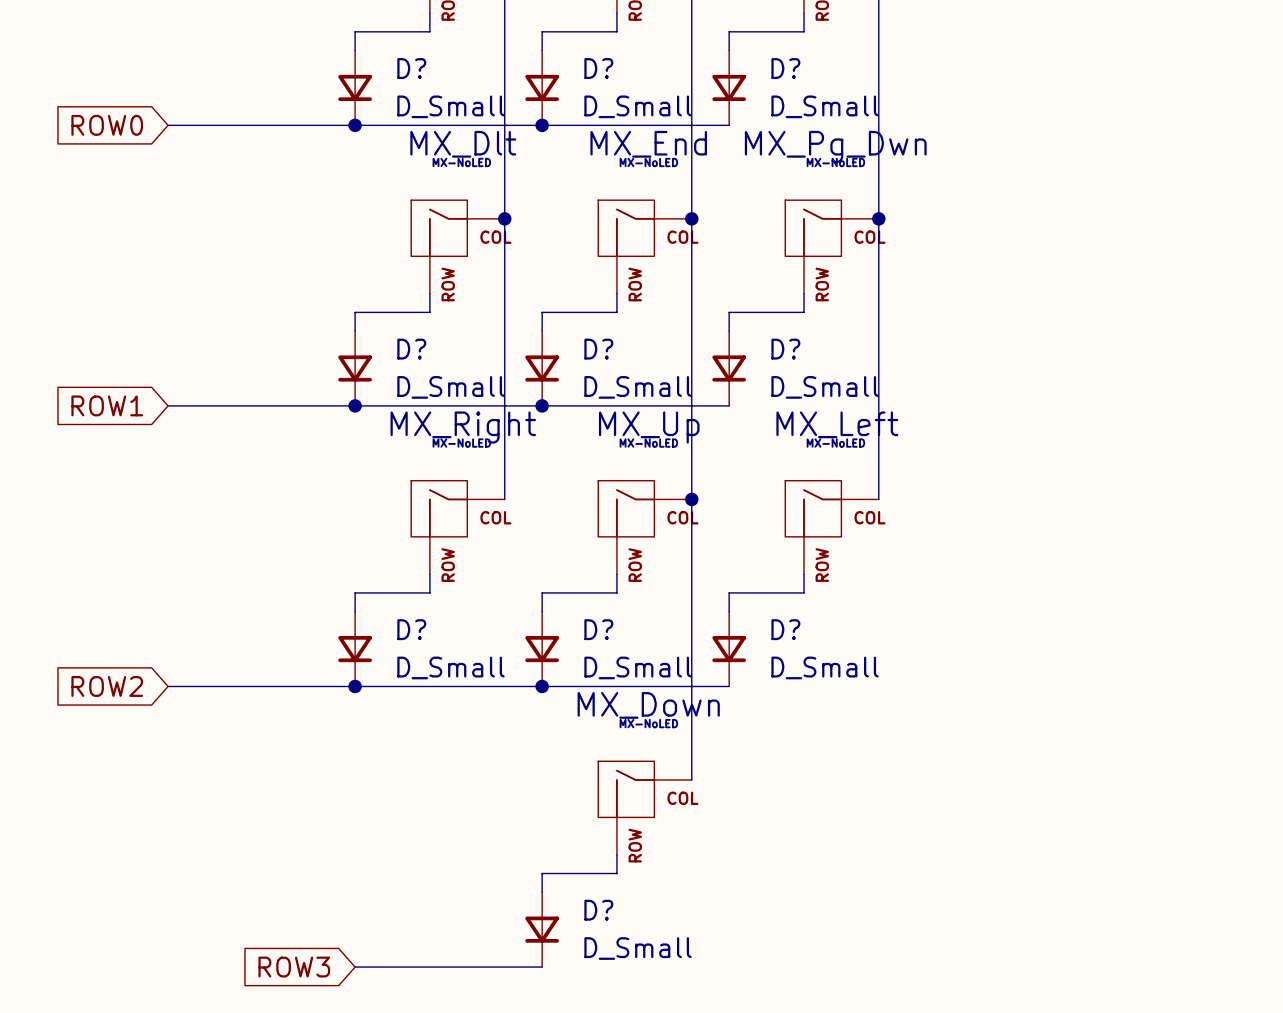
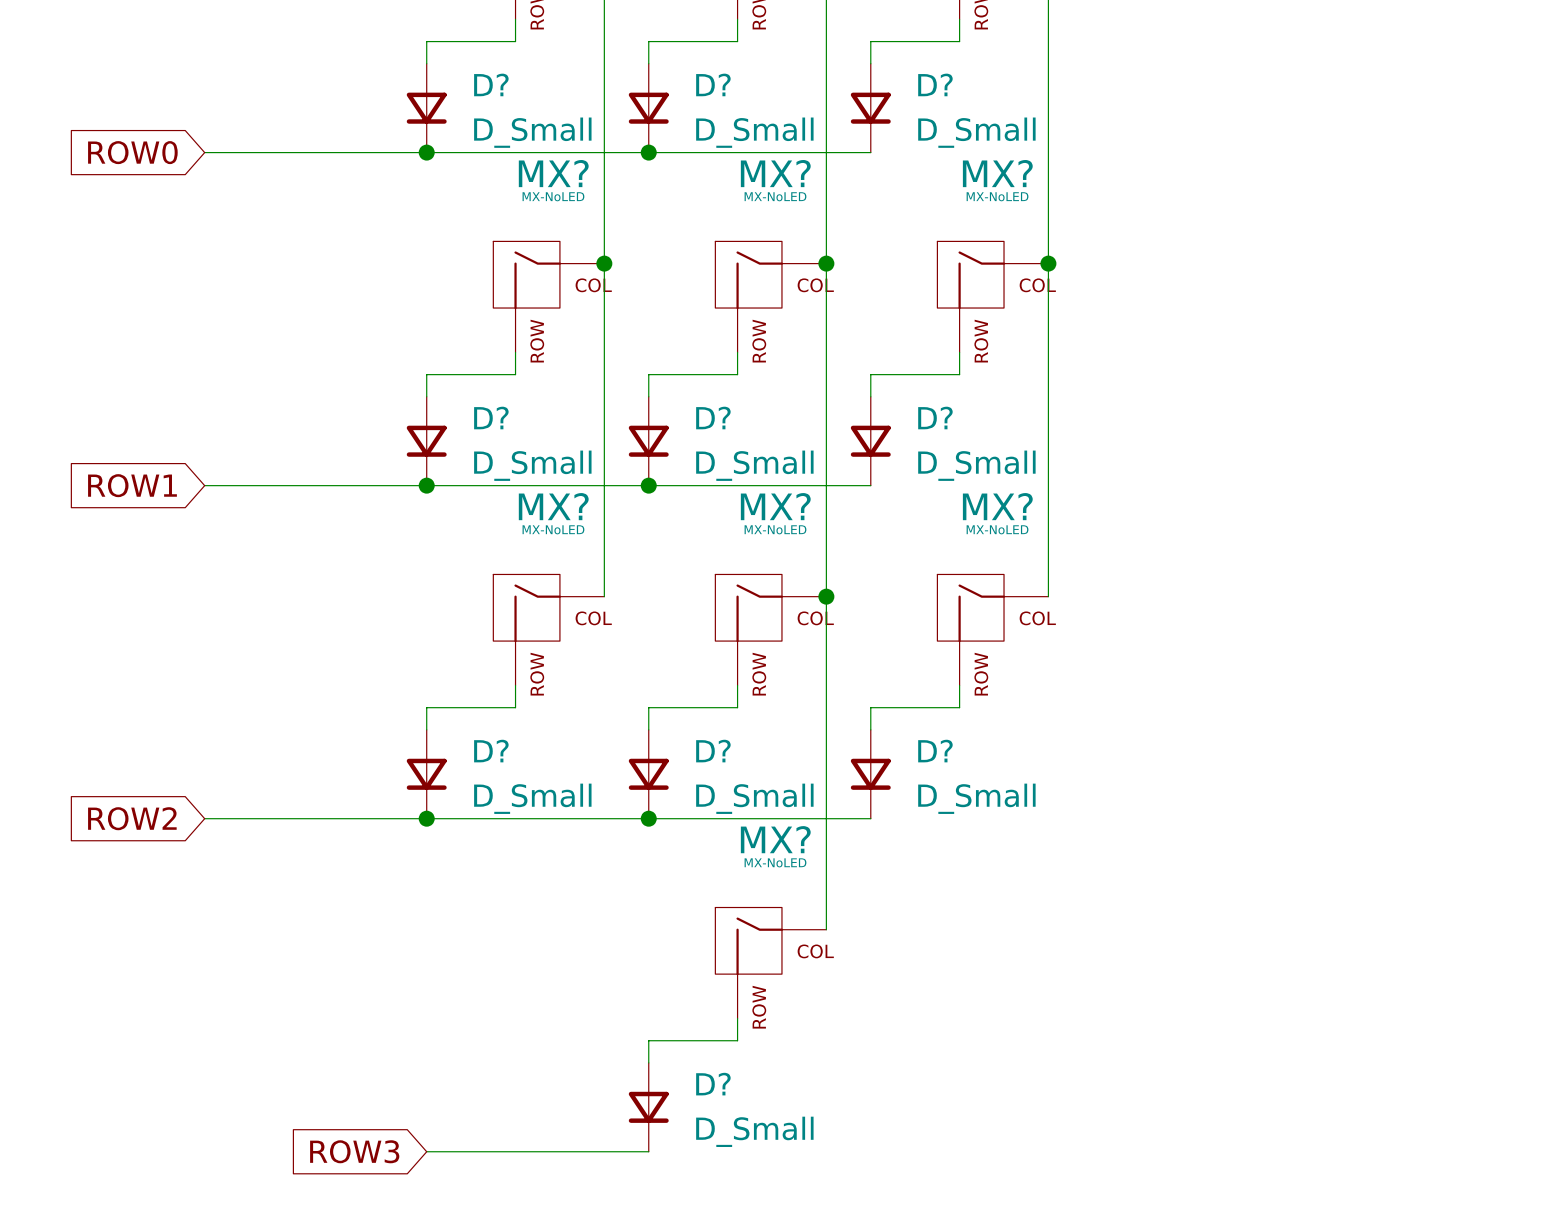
MX_Dlt name: MX_Dlt (463, 144) -> MX? (553, 173)
MX_End name: MX_End (648, 144) -> MX? (775, 173)
MX_Pg_Dwn name: MX_Pg_Dwn (835, 146) -> MX? (997, 173)
MX_Left name: MX_Left (837, 424) -> MX? (997, 506)
MX_Right name: MX_Right (463, 427) -> MX? (553, 506)
MX_Up name: MX_Up (649, 427) -> MX? (775, 506)
MX_Down name: MX_Down (648, 705) -> MX? (775, 839)

